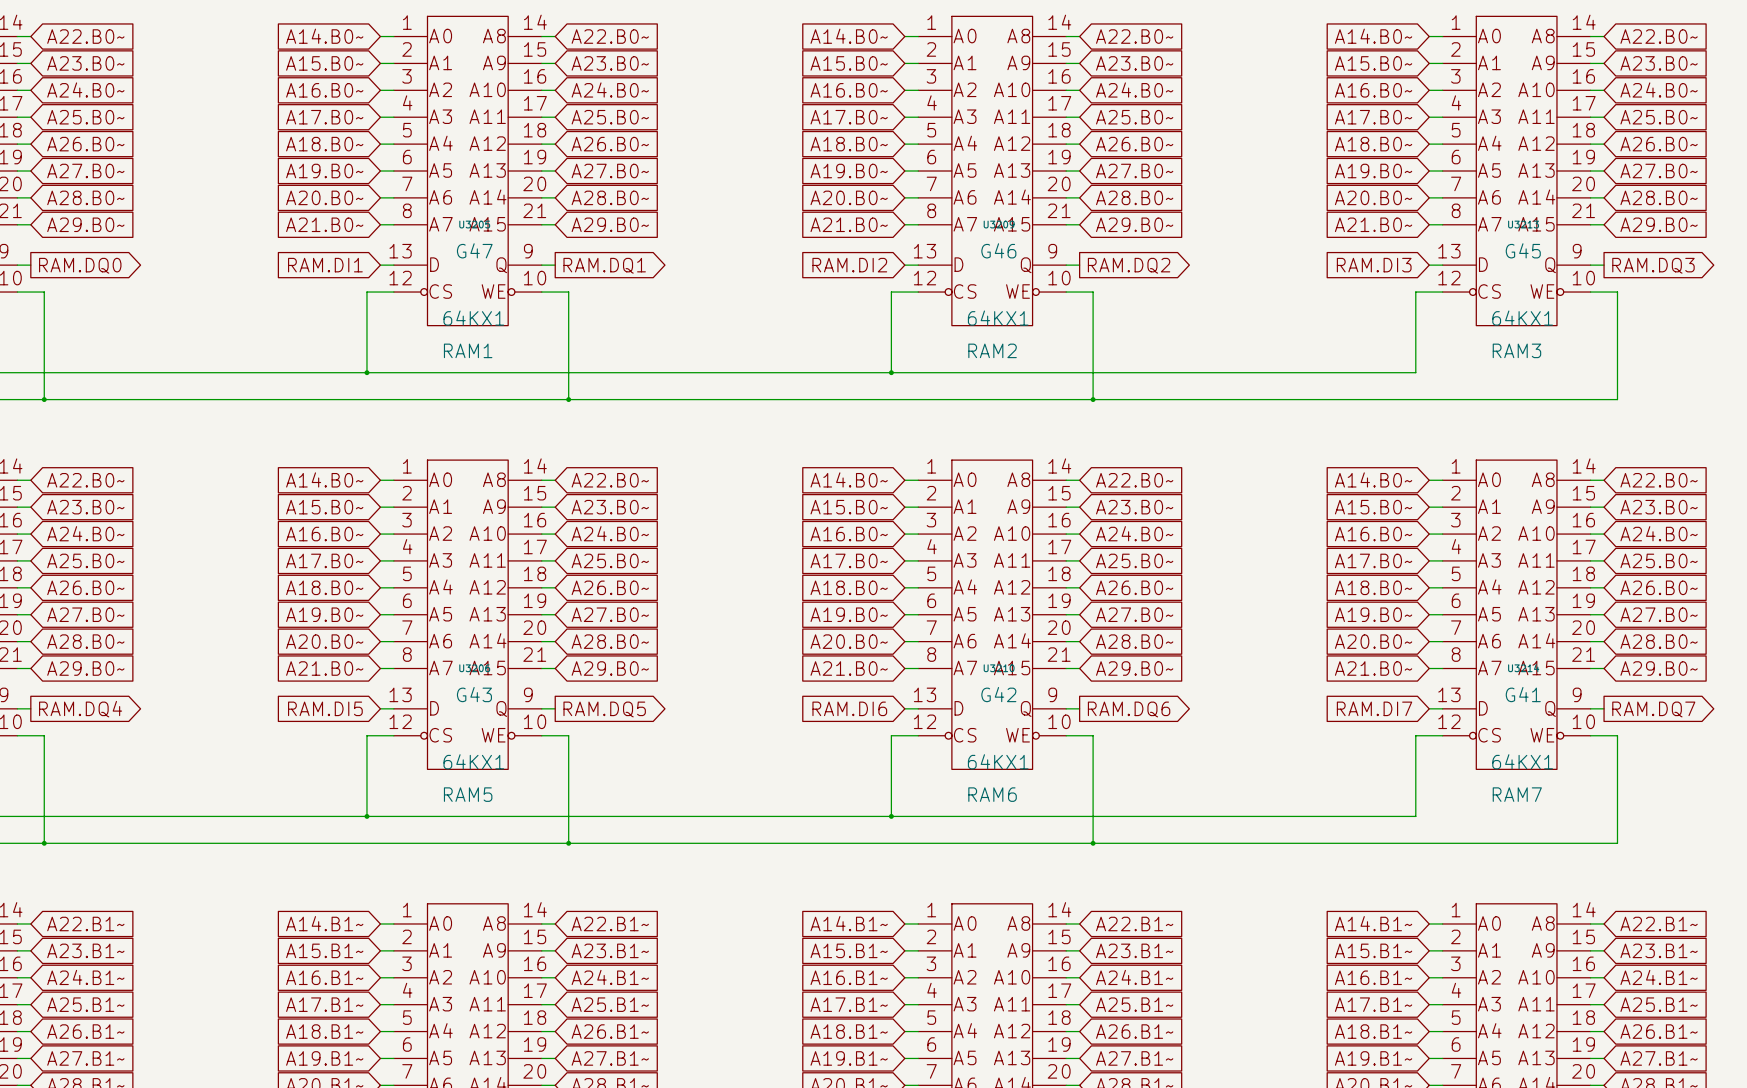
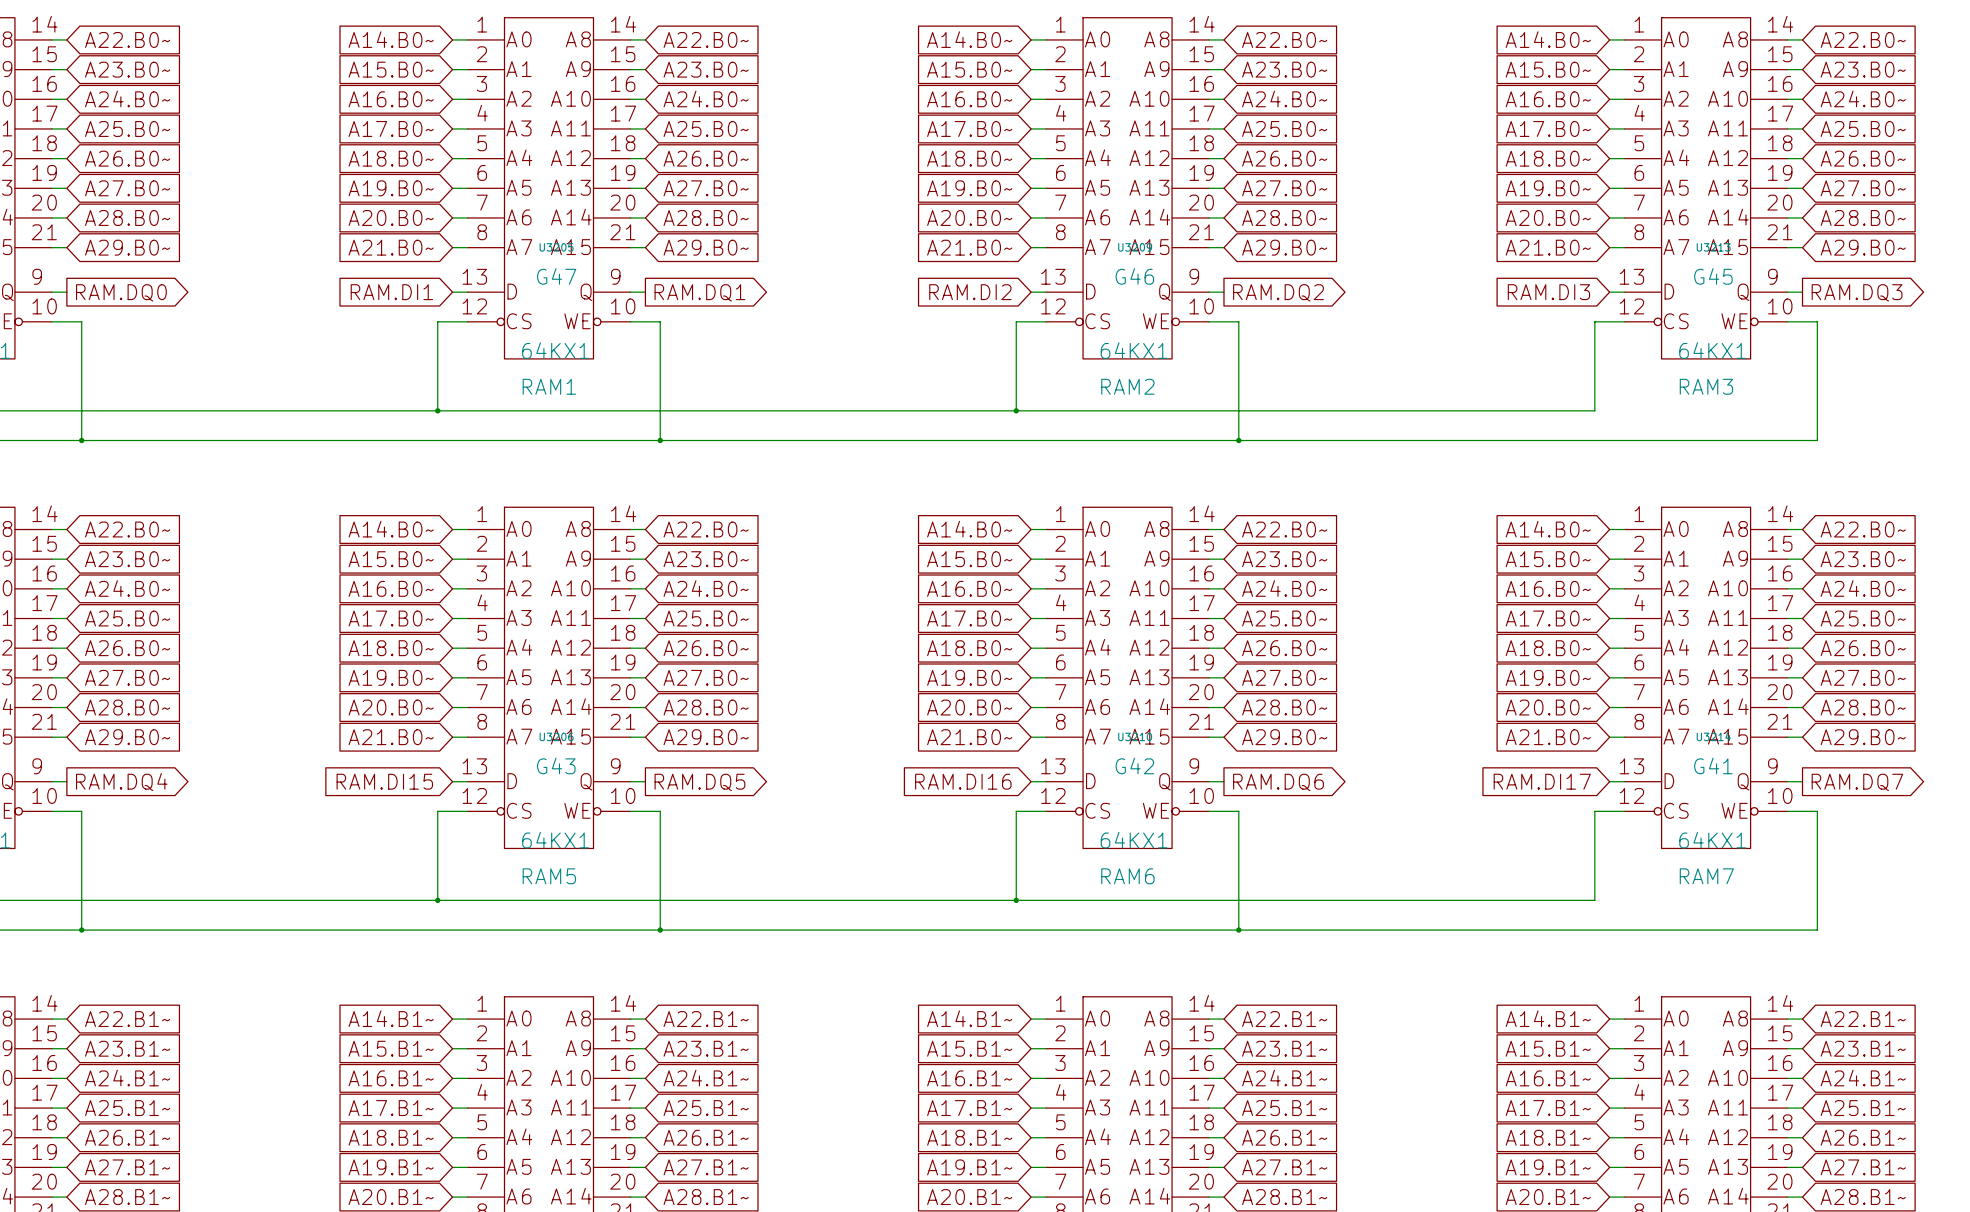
global label: RAM.DI5 (325, 708) -> RAM.DI15 (384, 781)
global label: RAM.DI6 (849, 708) -> RAM.DI16 (963, 781)
global label: RAM.DI7 (1374, 708) -> RAM.DI17 (1542, 781)

